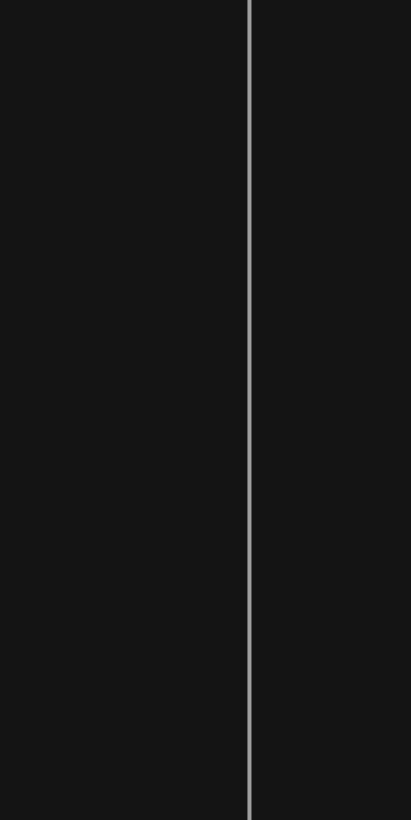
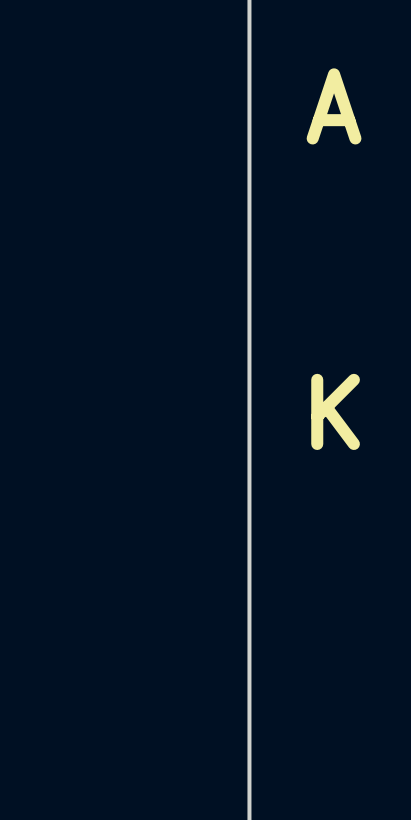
text: none -> A (334, 106)
text: none -> K (335, 411)

